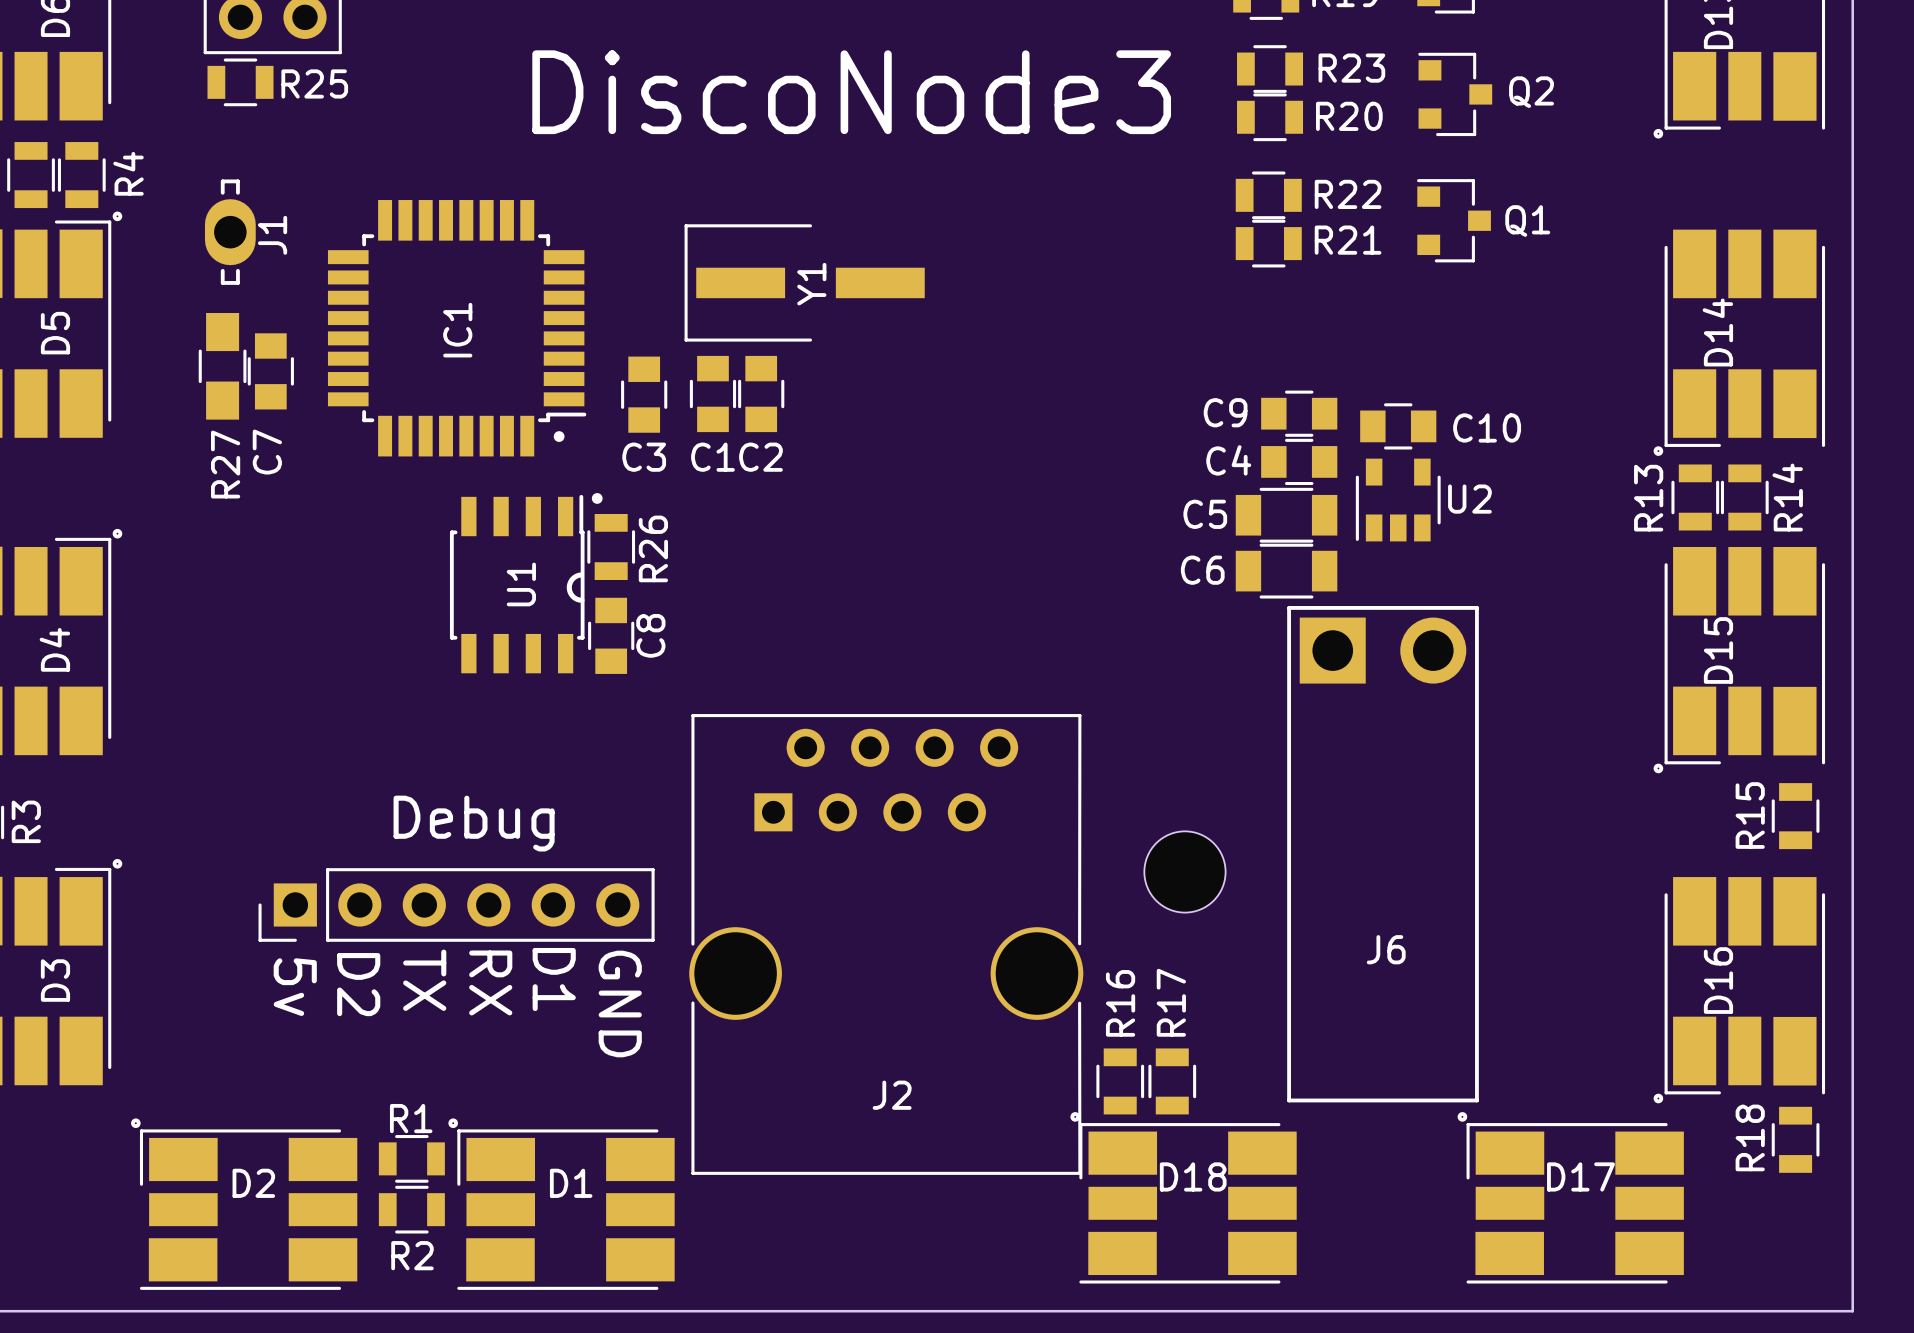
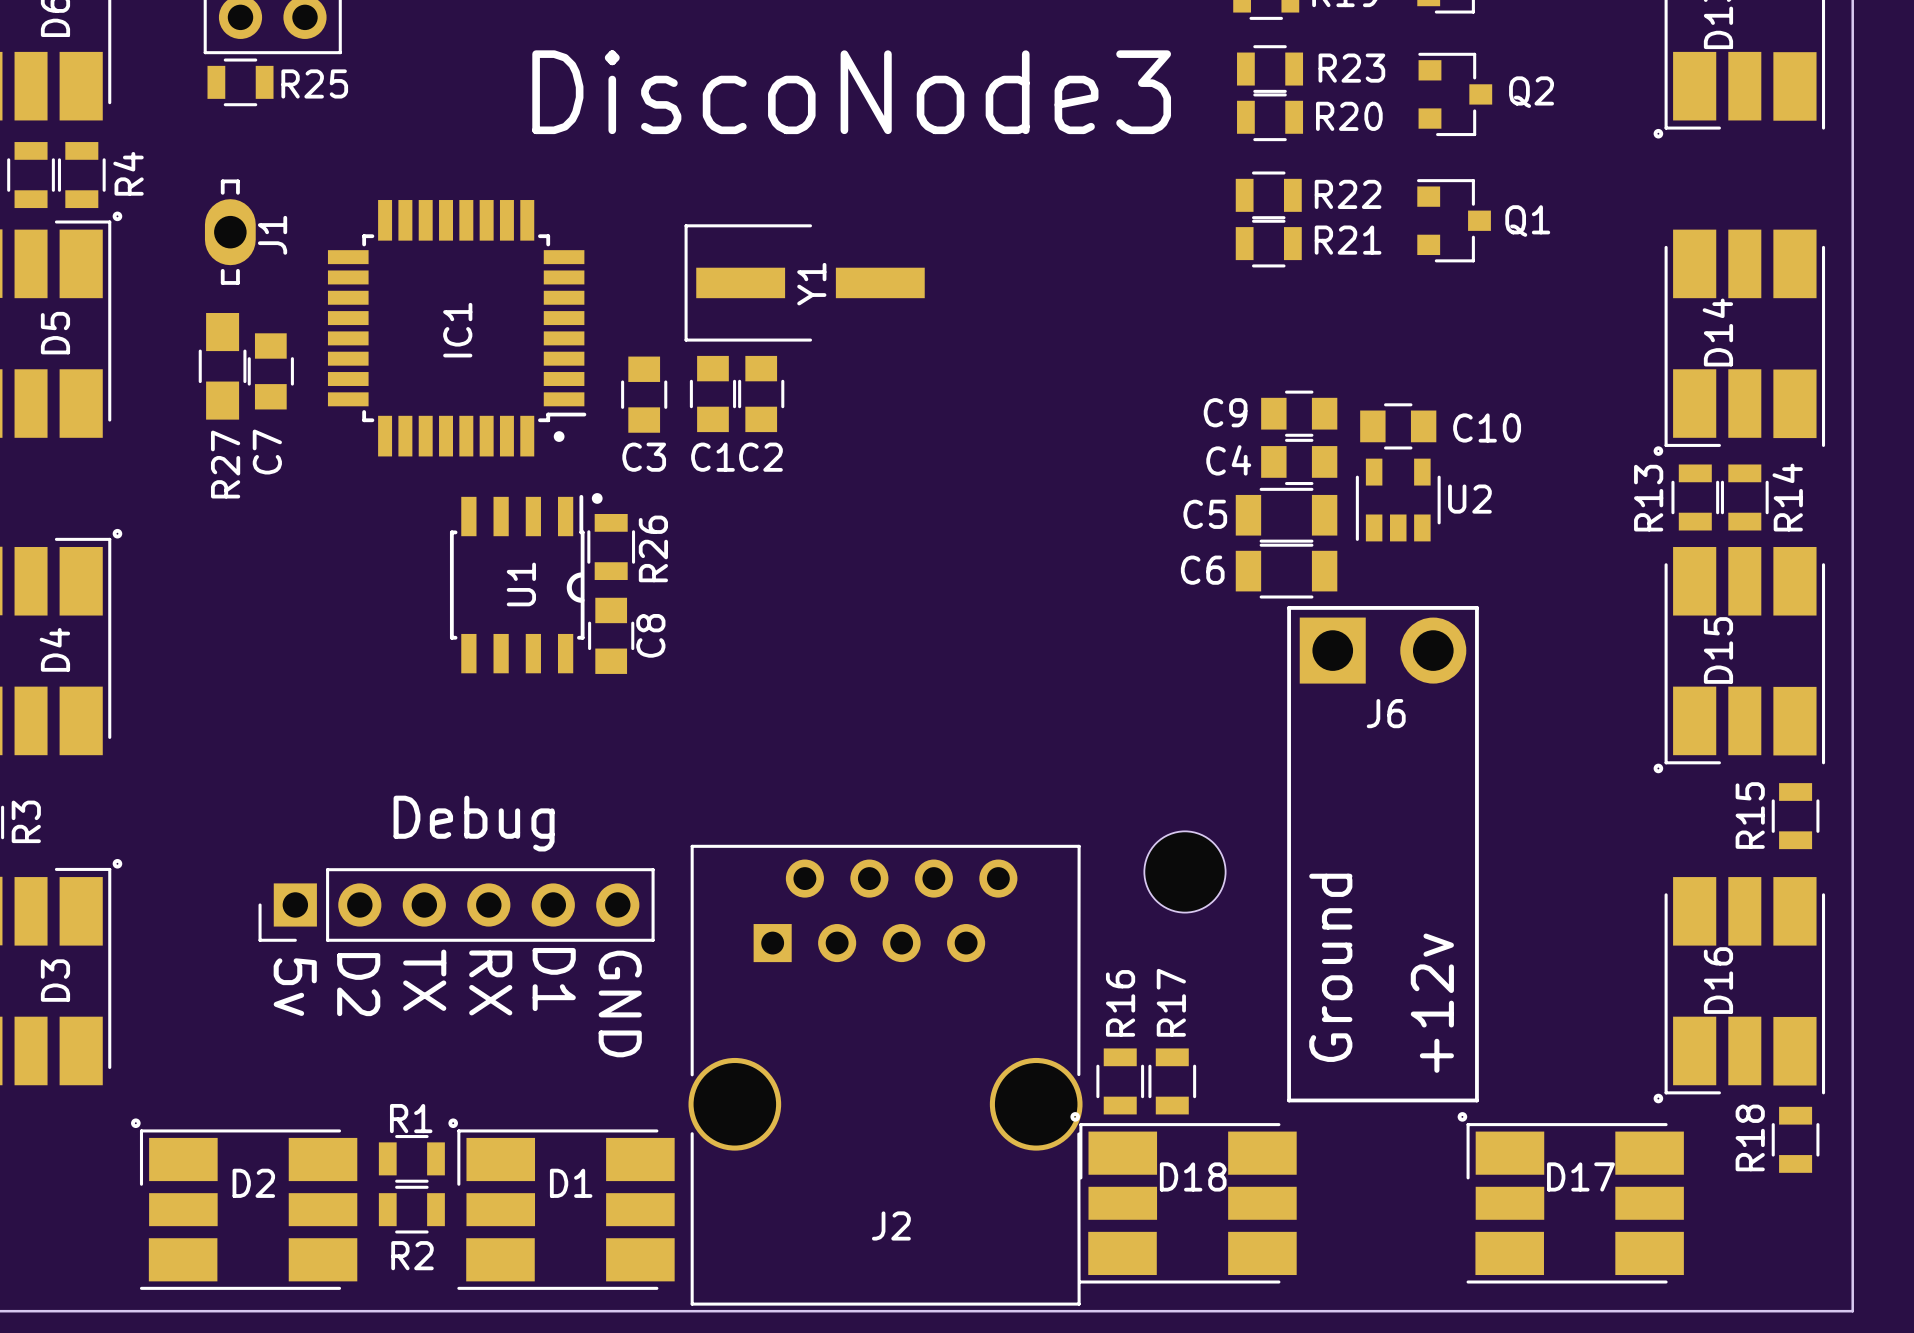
J2 position: (886, 944) -> (885, 1075)
J6 name position: J6 (1386, 949) -> J6 (1386, 713)
text: none -> Ground (1330, 967)
text: none -> +12v (1432, 1003)

